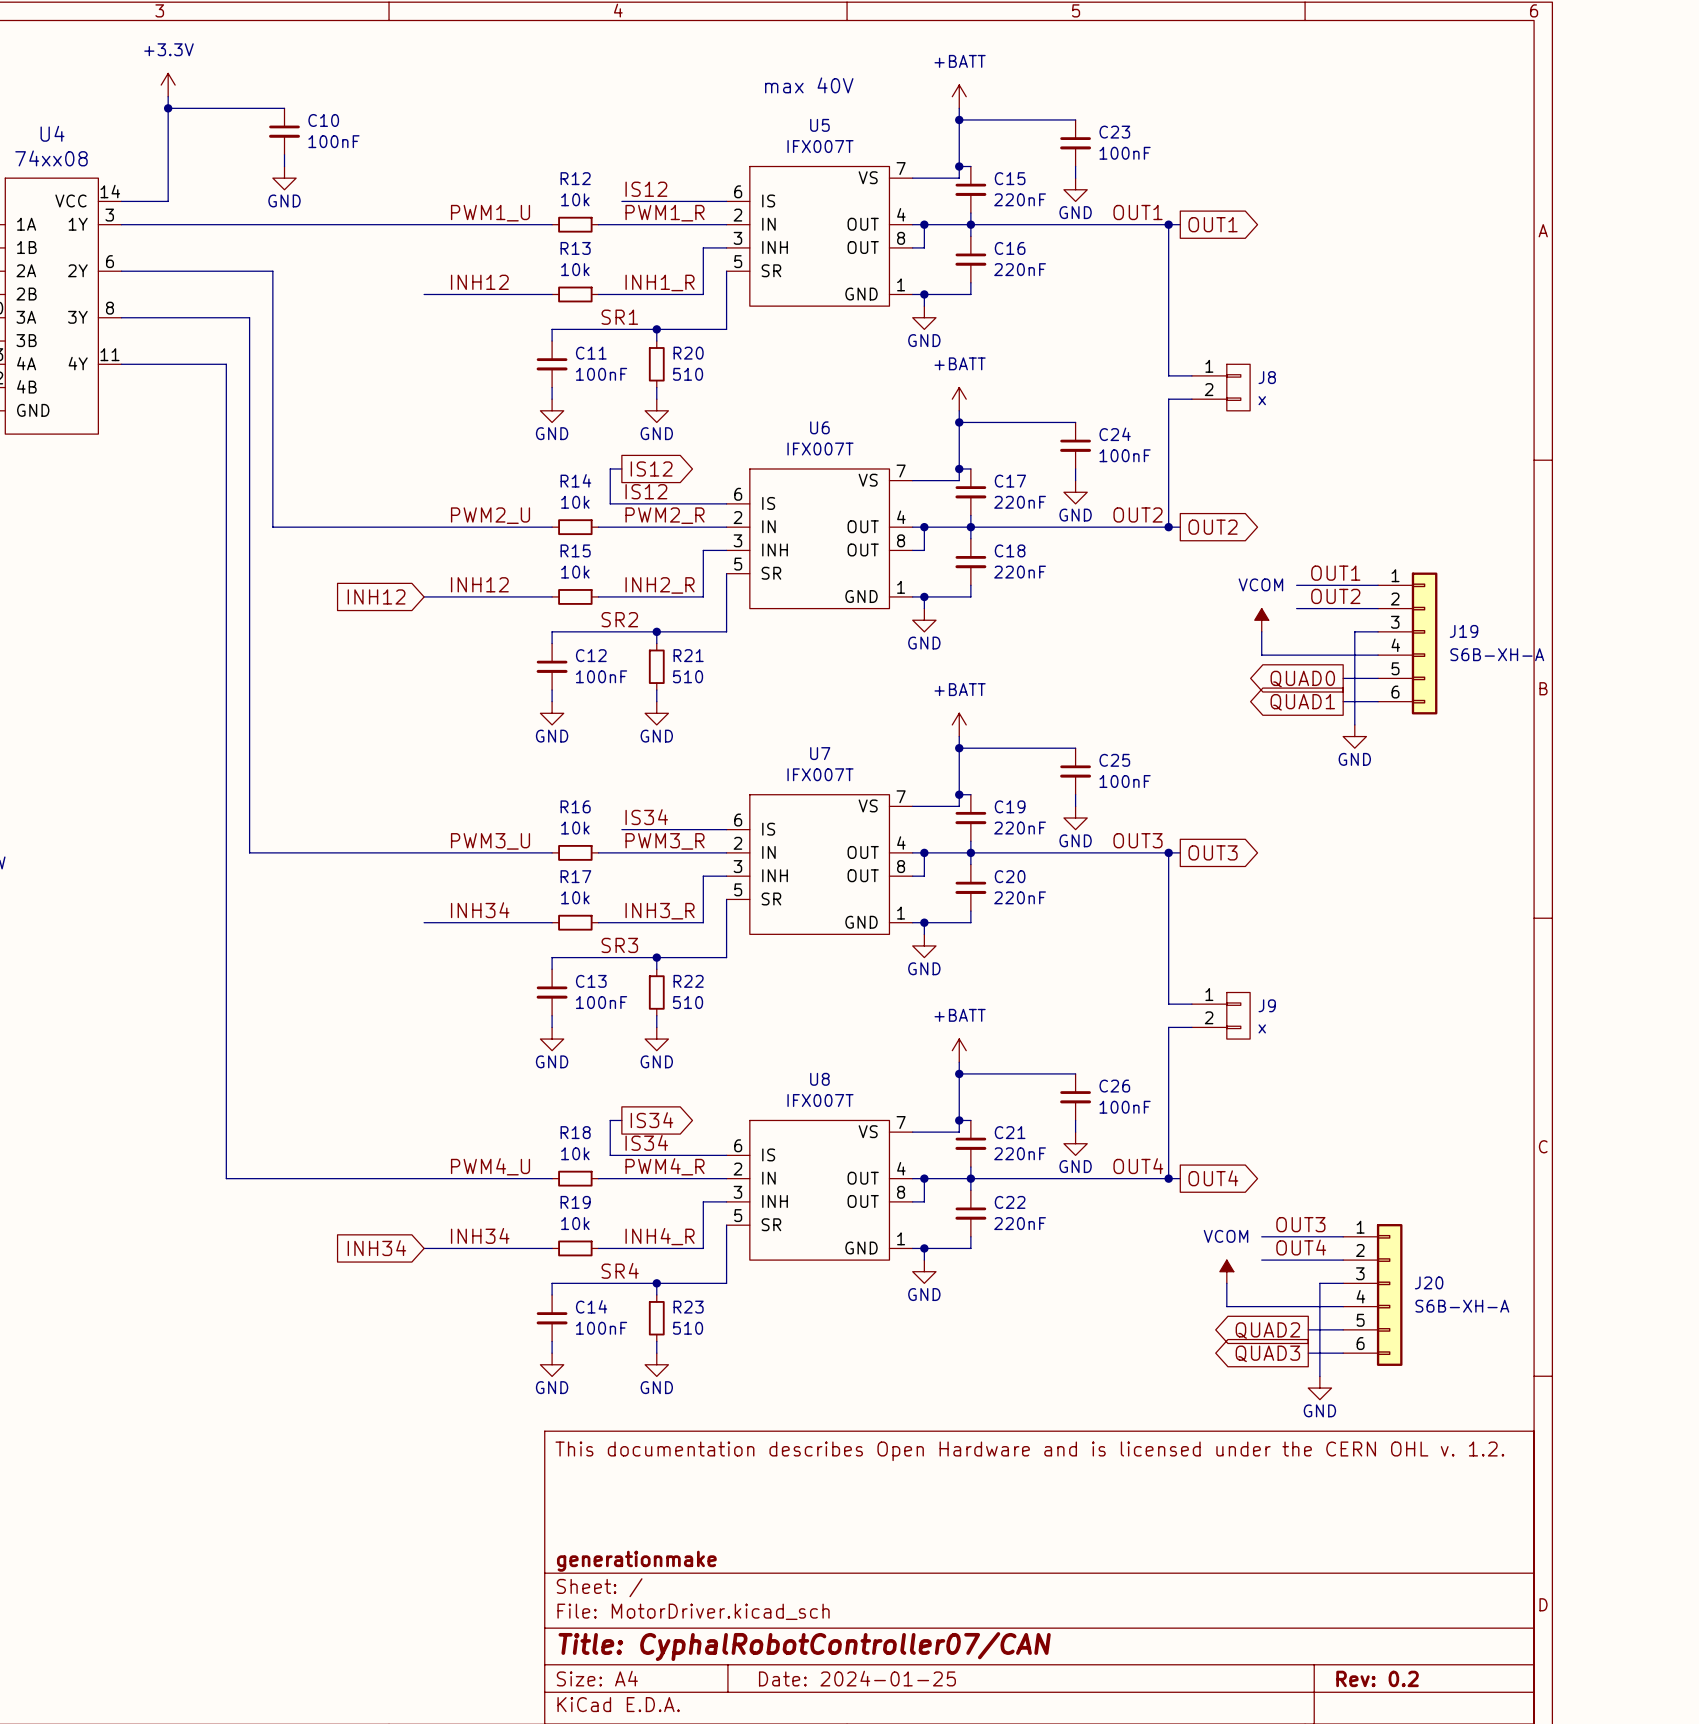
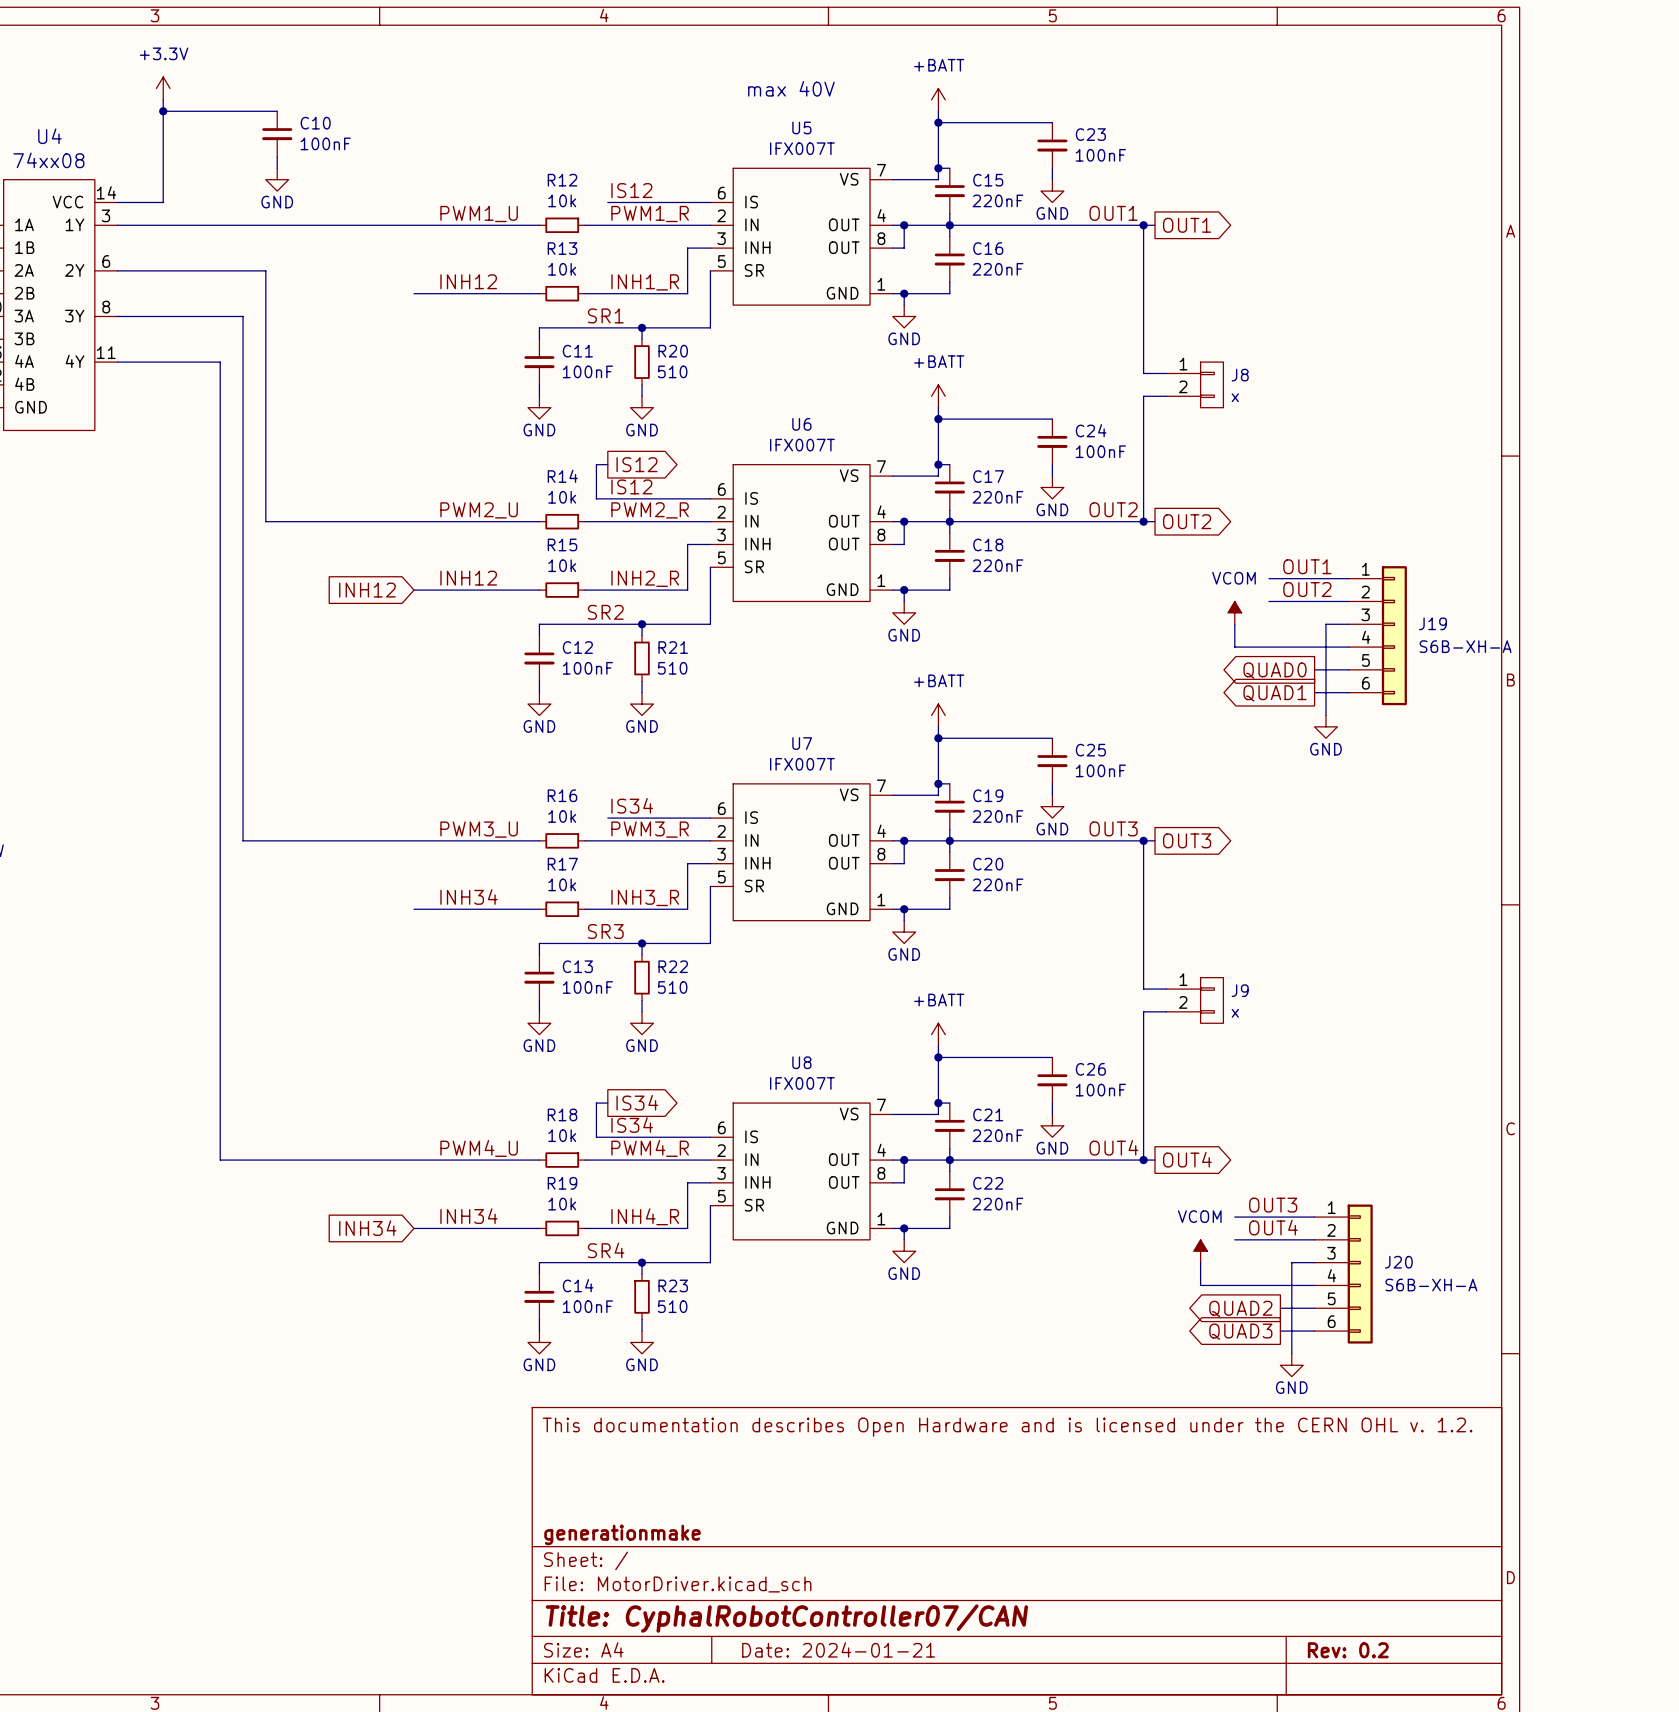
title block: Date: 2024-01-25 (857, 1678) -> Date: 2024-01-21 (838, 1649)

